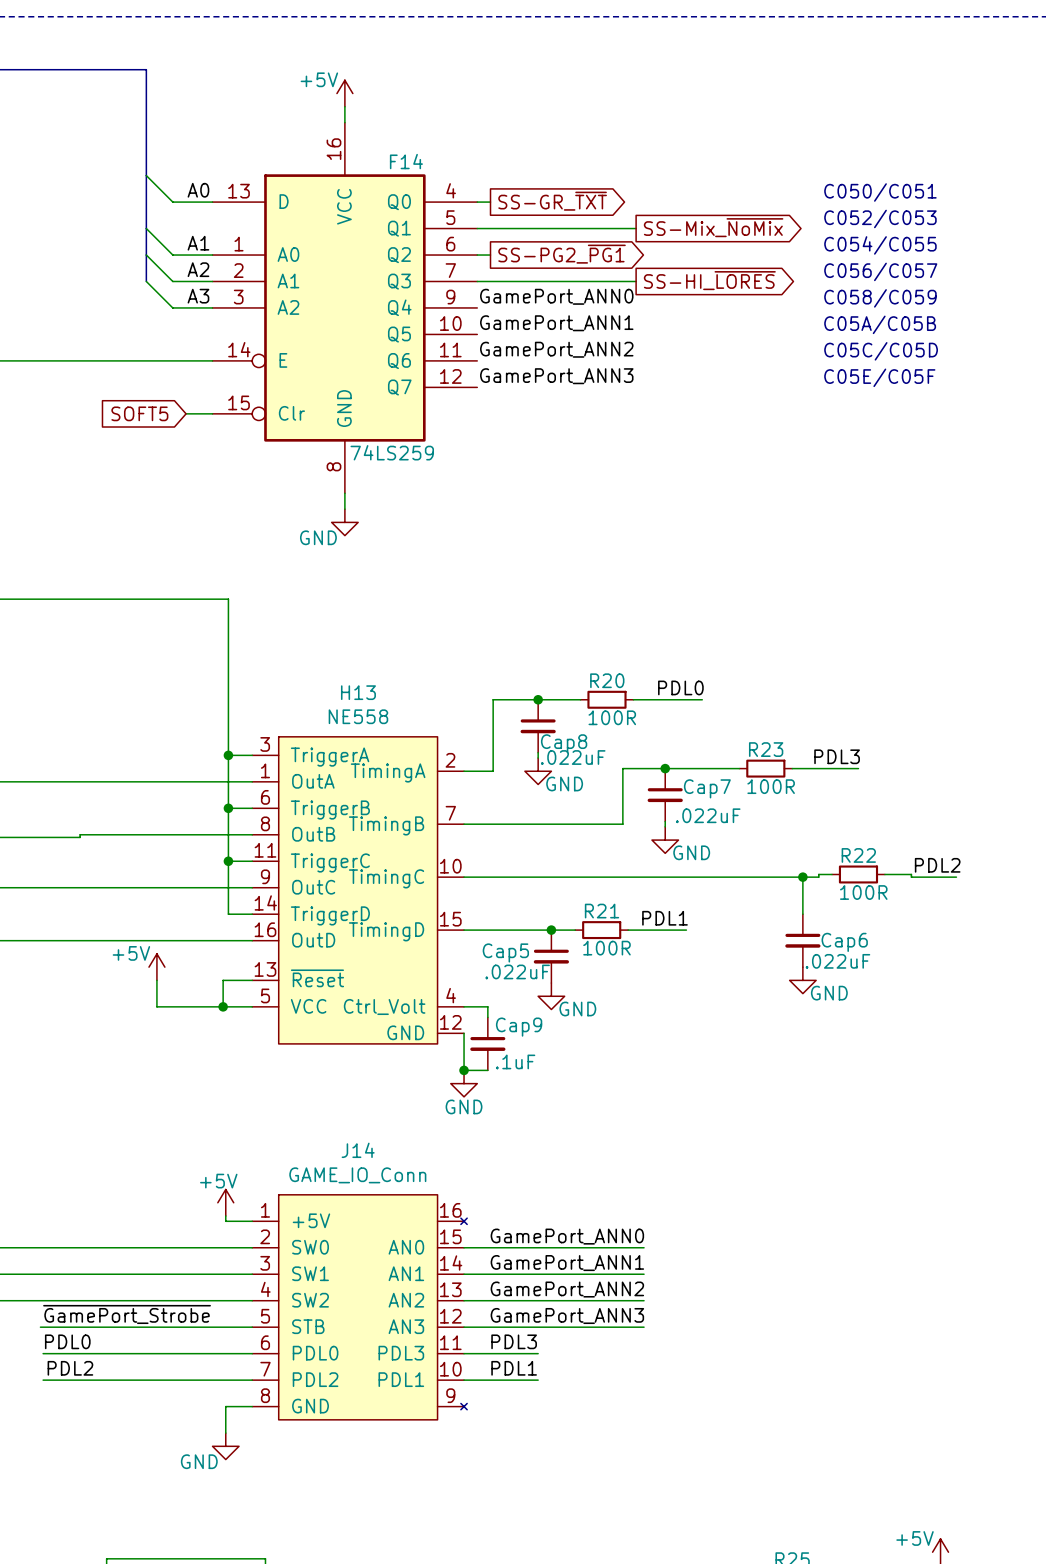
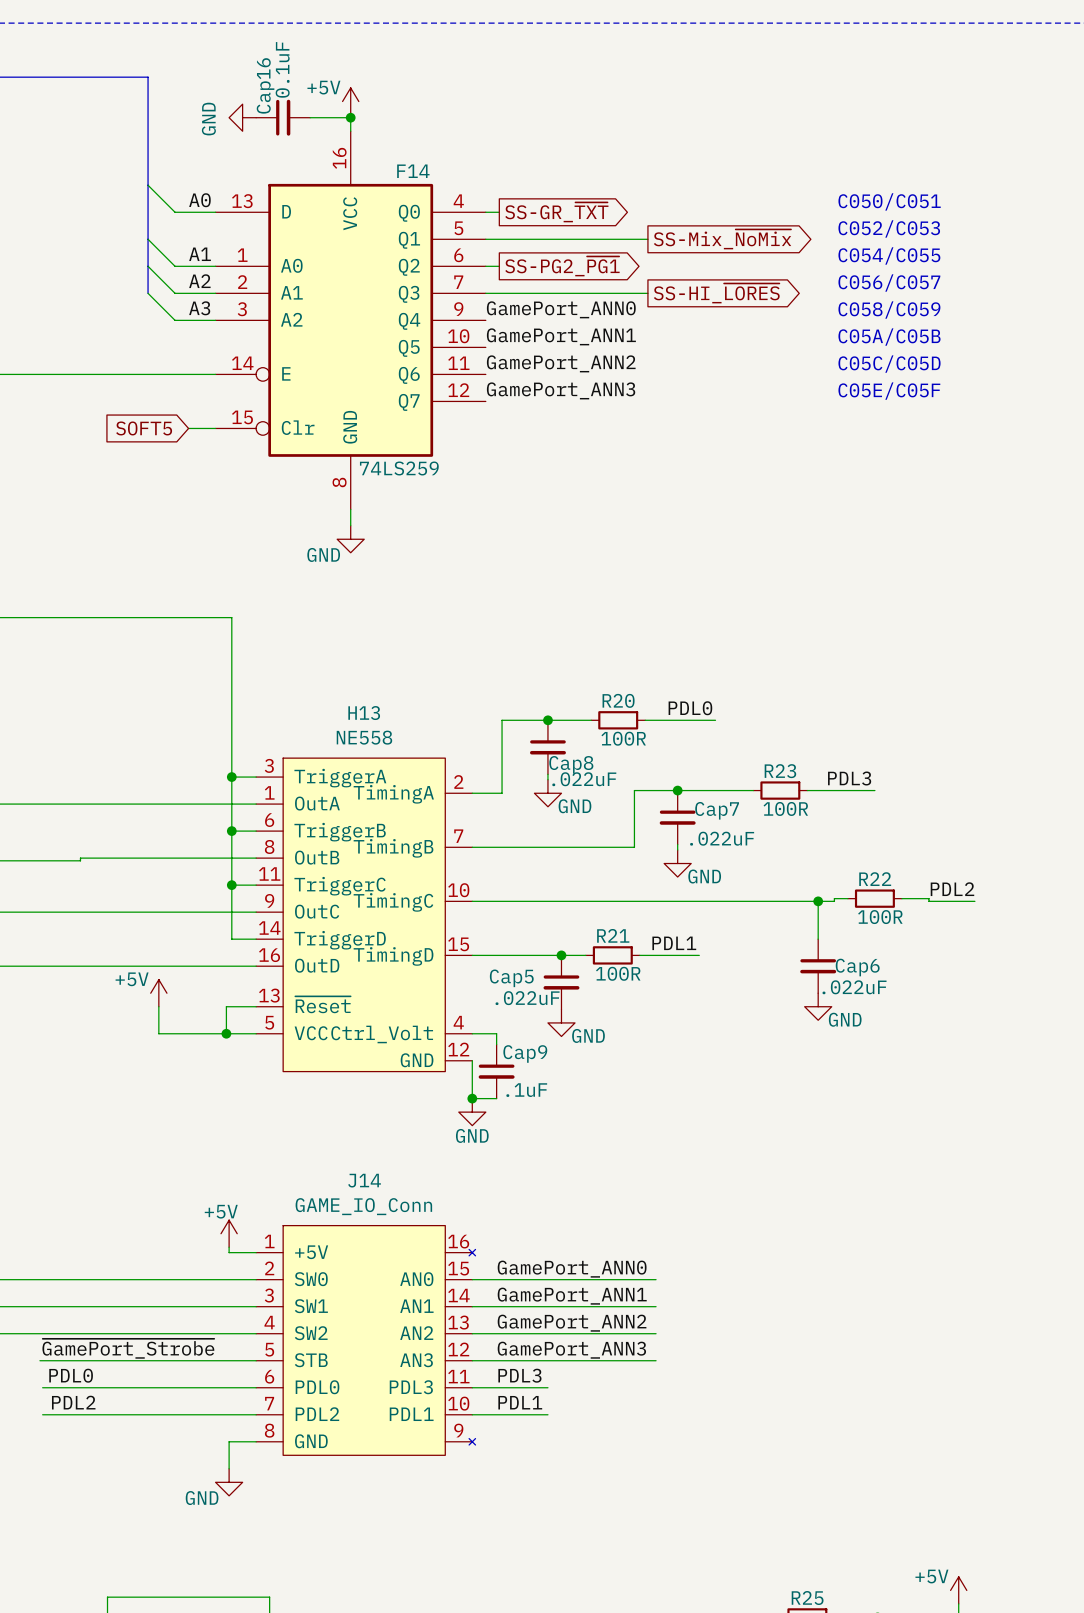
power symbol: none -> GND (242, 117)
Cap16: none -> 0.1uF (283, 117)
wire: none -> (310, 117) (350, 117)
junction: none -> (350, 117)

